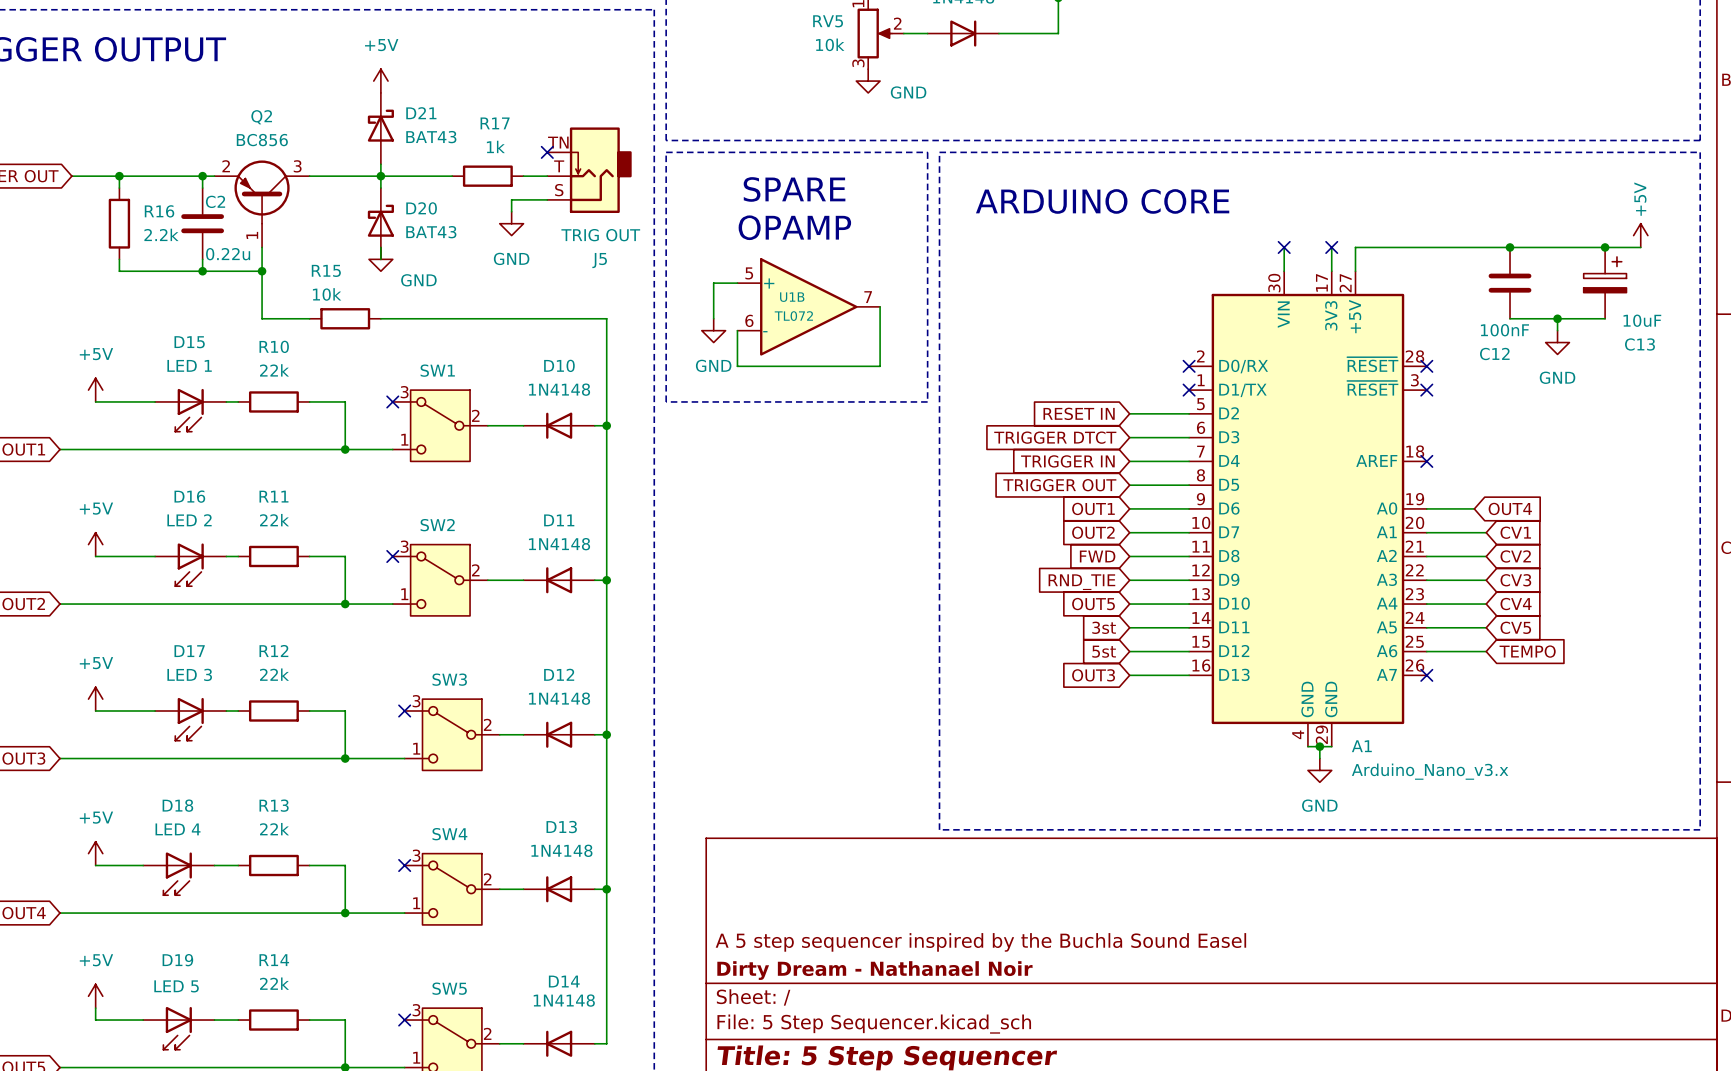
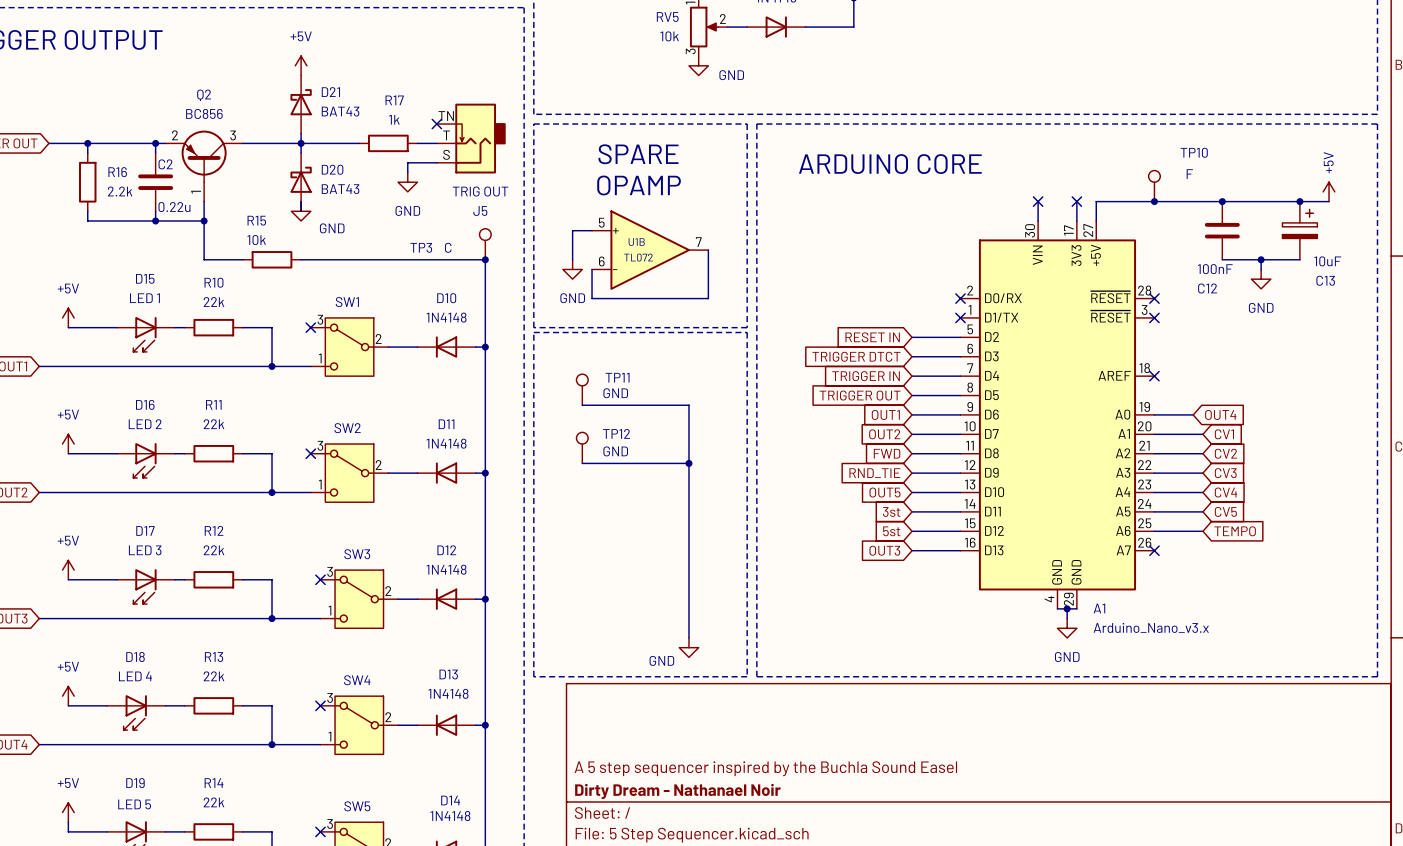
TP10: none -> F (1154, 186)
junction: none -> (1154, 201)
TP3: none -> C (485, 244)
junction: none -> (485, 259)
line: none -> (533, 332) (747, 332) (747, 676) (533, 676) (533, 332)
TP11: none -> GND (582, 389)
wire: none -> (582, 405) (688, 405) (688, 637)
TP12: none -> GND (582, 447)
wire: none -> (582, 463) (688, 463)
junction: none -> (688, 463)
power symbol: none -> GND (688, 647)

